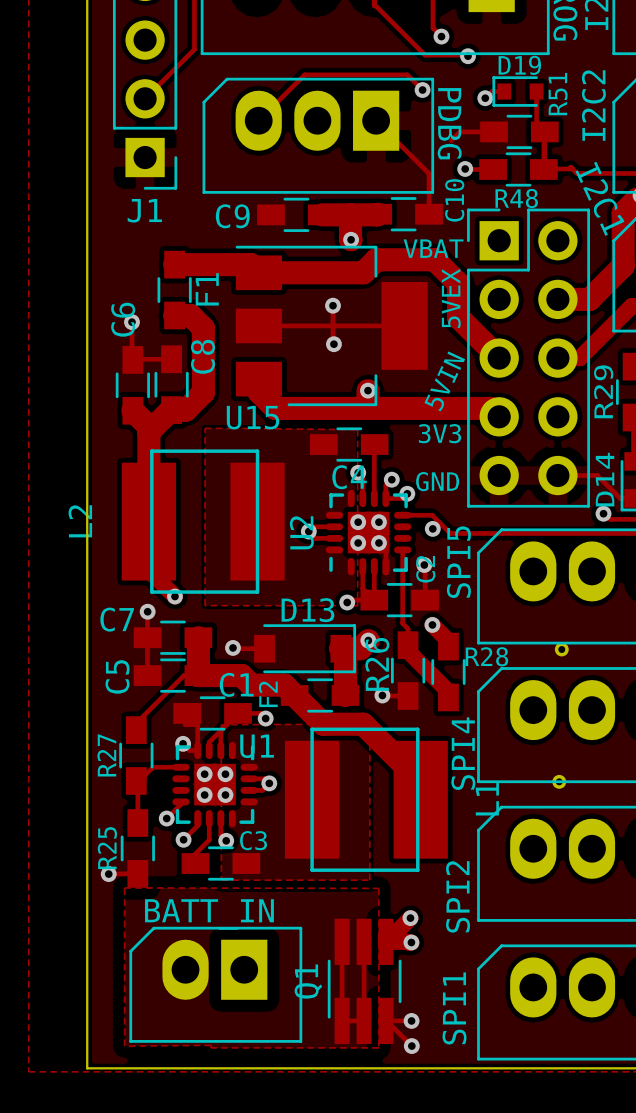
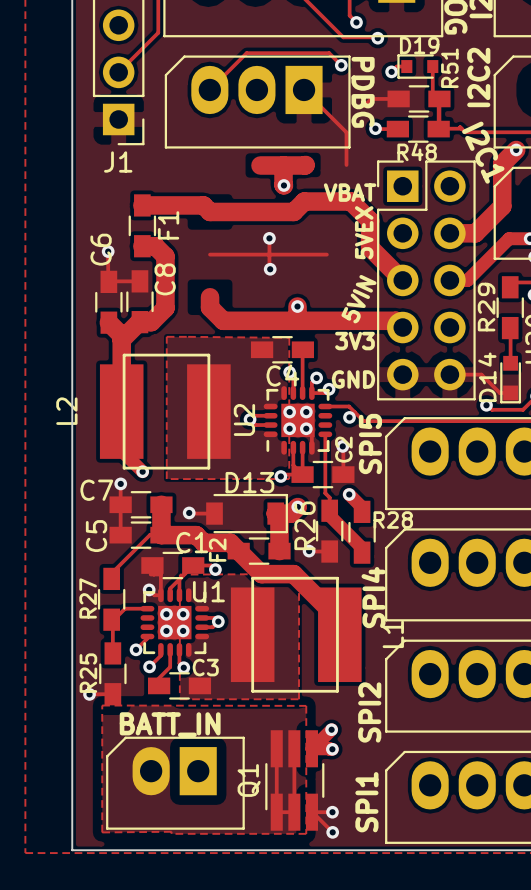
C9: (296, 214) -> none
C10: (403, 214) -> none
U15: (331, 325) -> none
part: (561, 649) -> none
part: (559, 781) -> none

